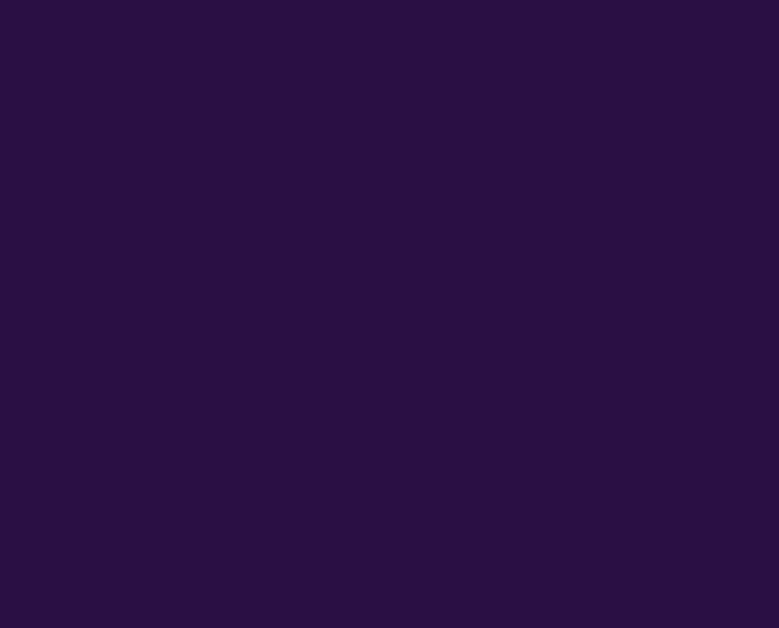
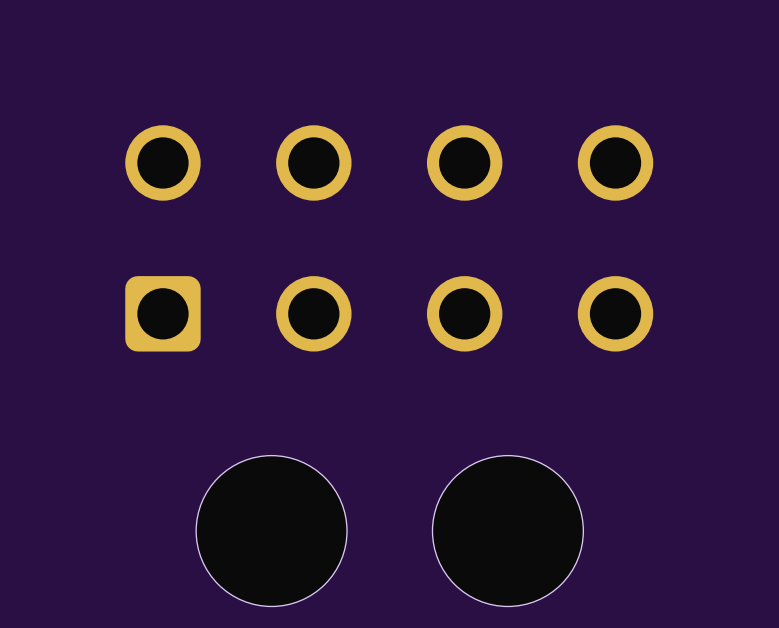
part: none -> (389, 365)

